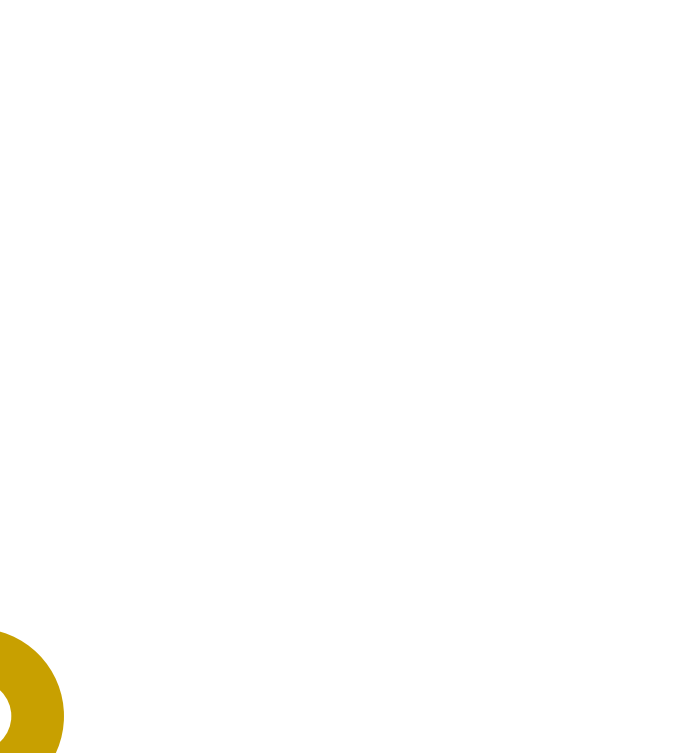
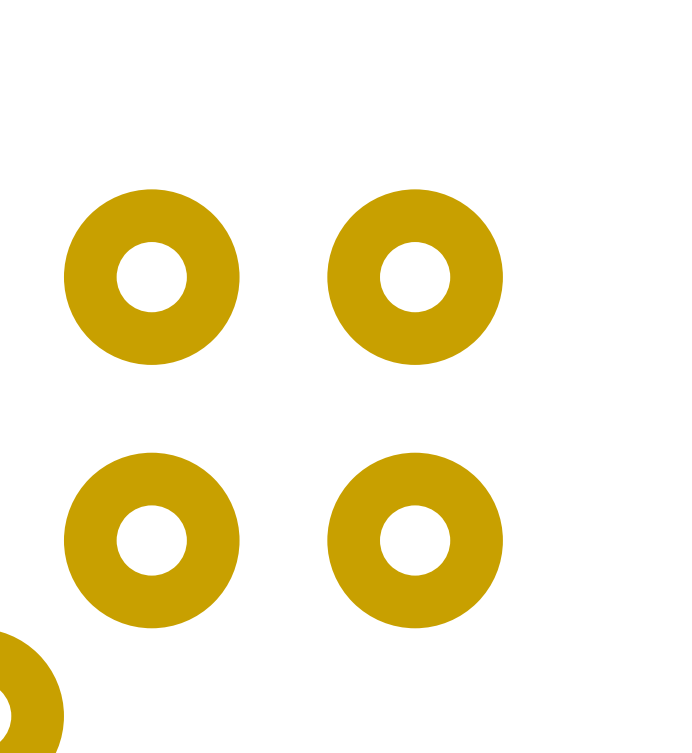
part: none -> (151, 277)
part: none -> (415, 277)
part: none -> (151, 540)
part: none -> (415, 540)

